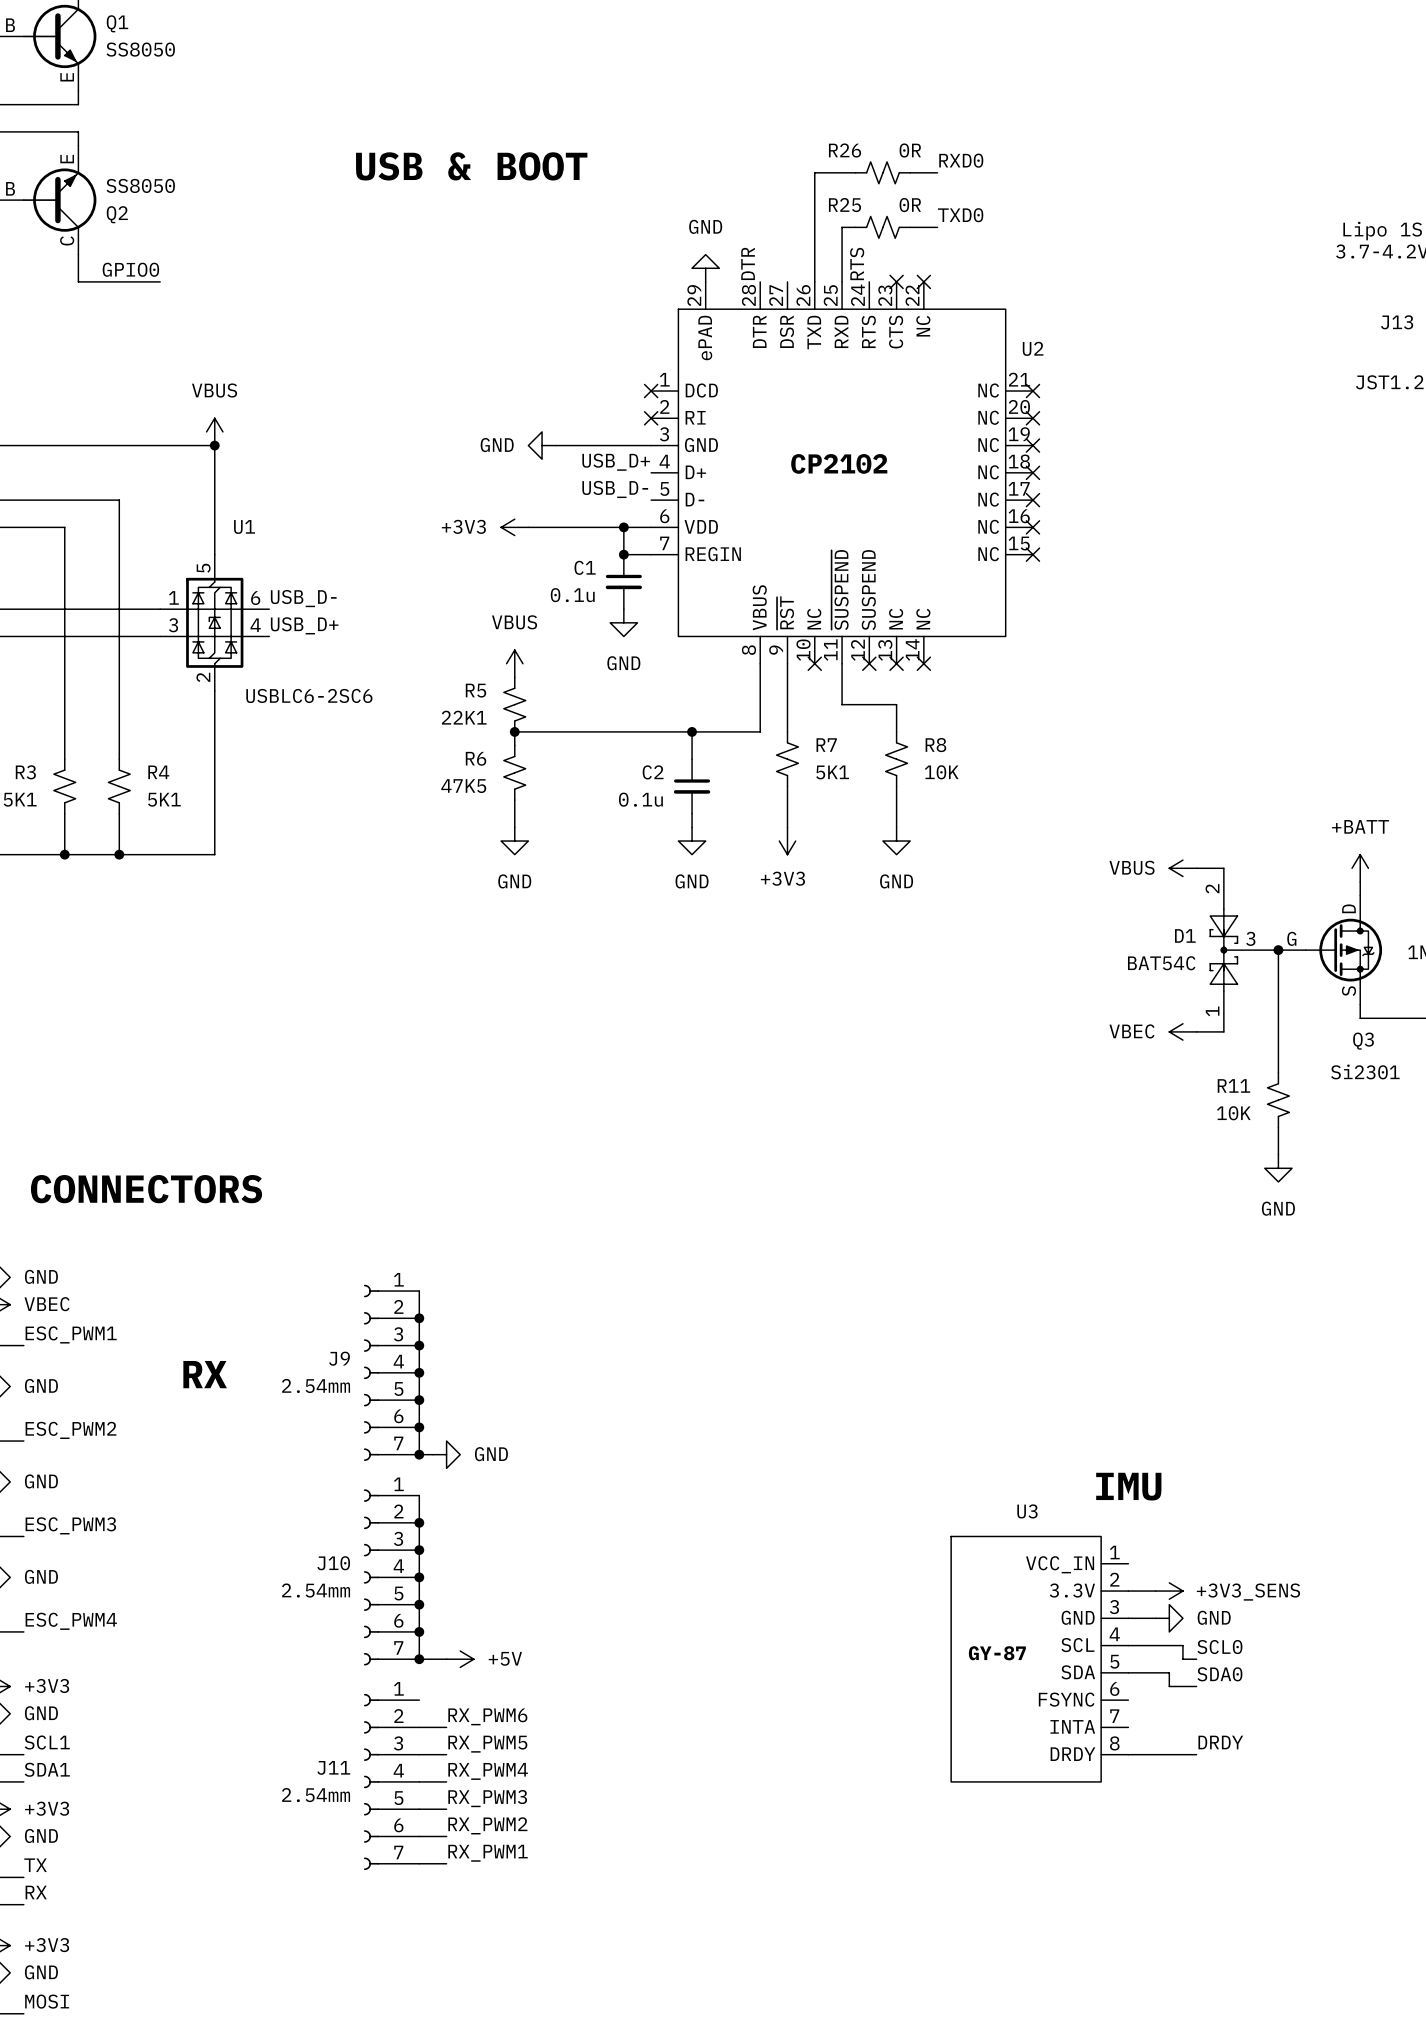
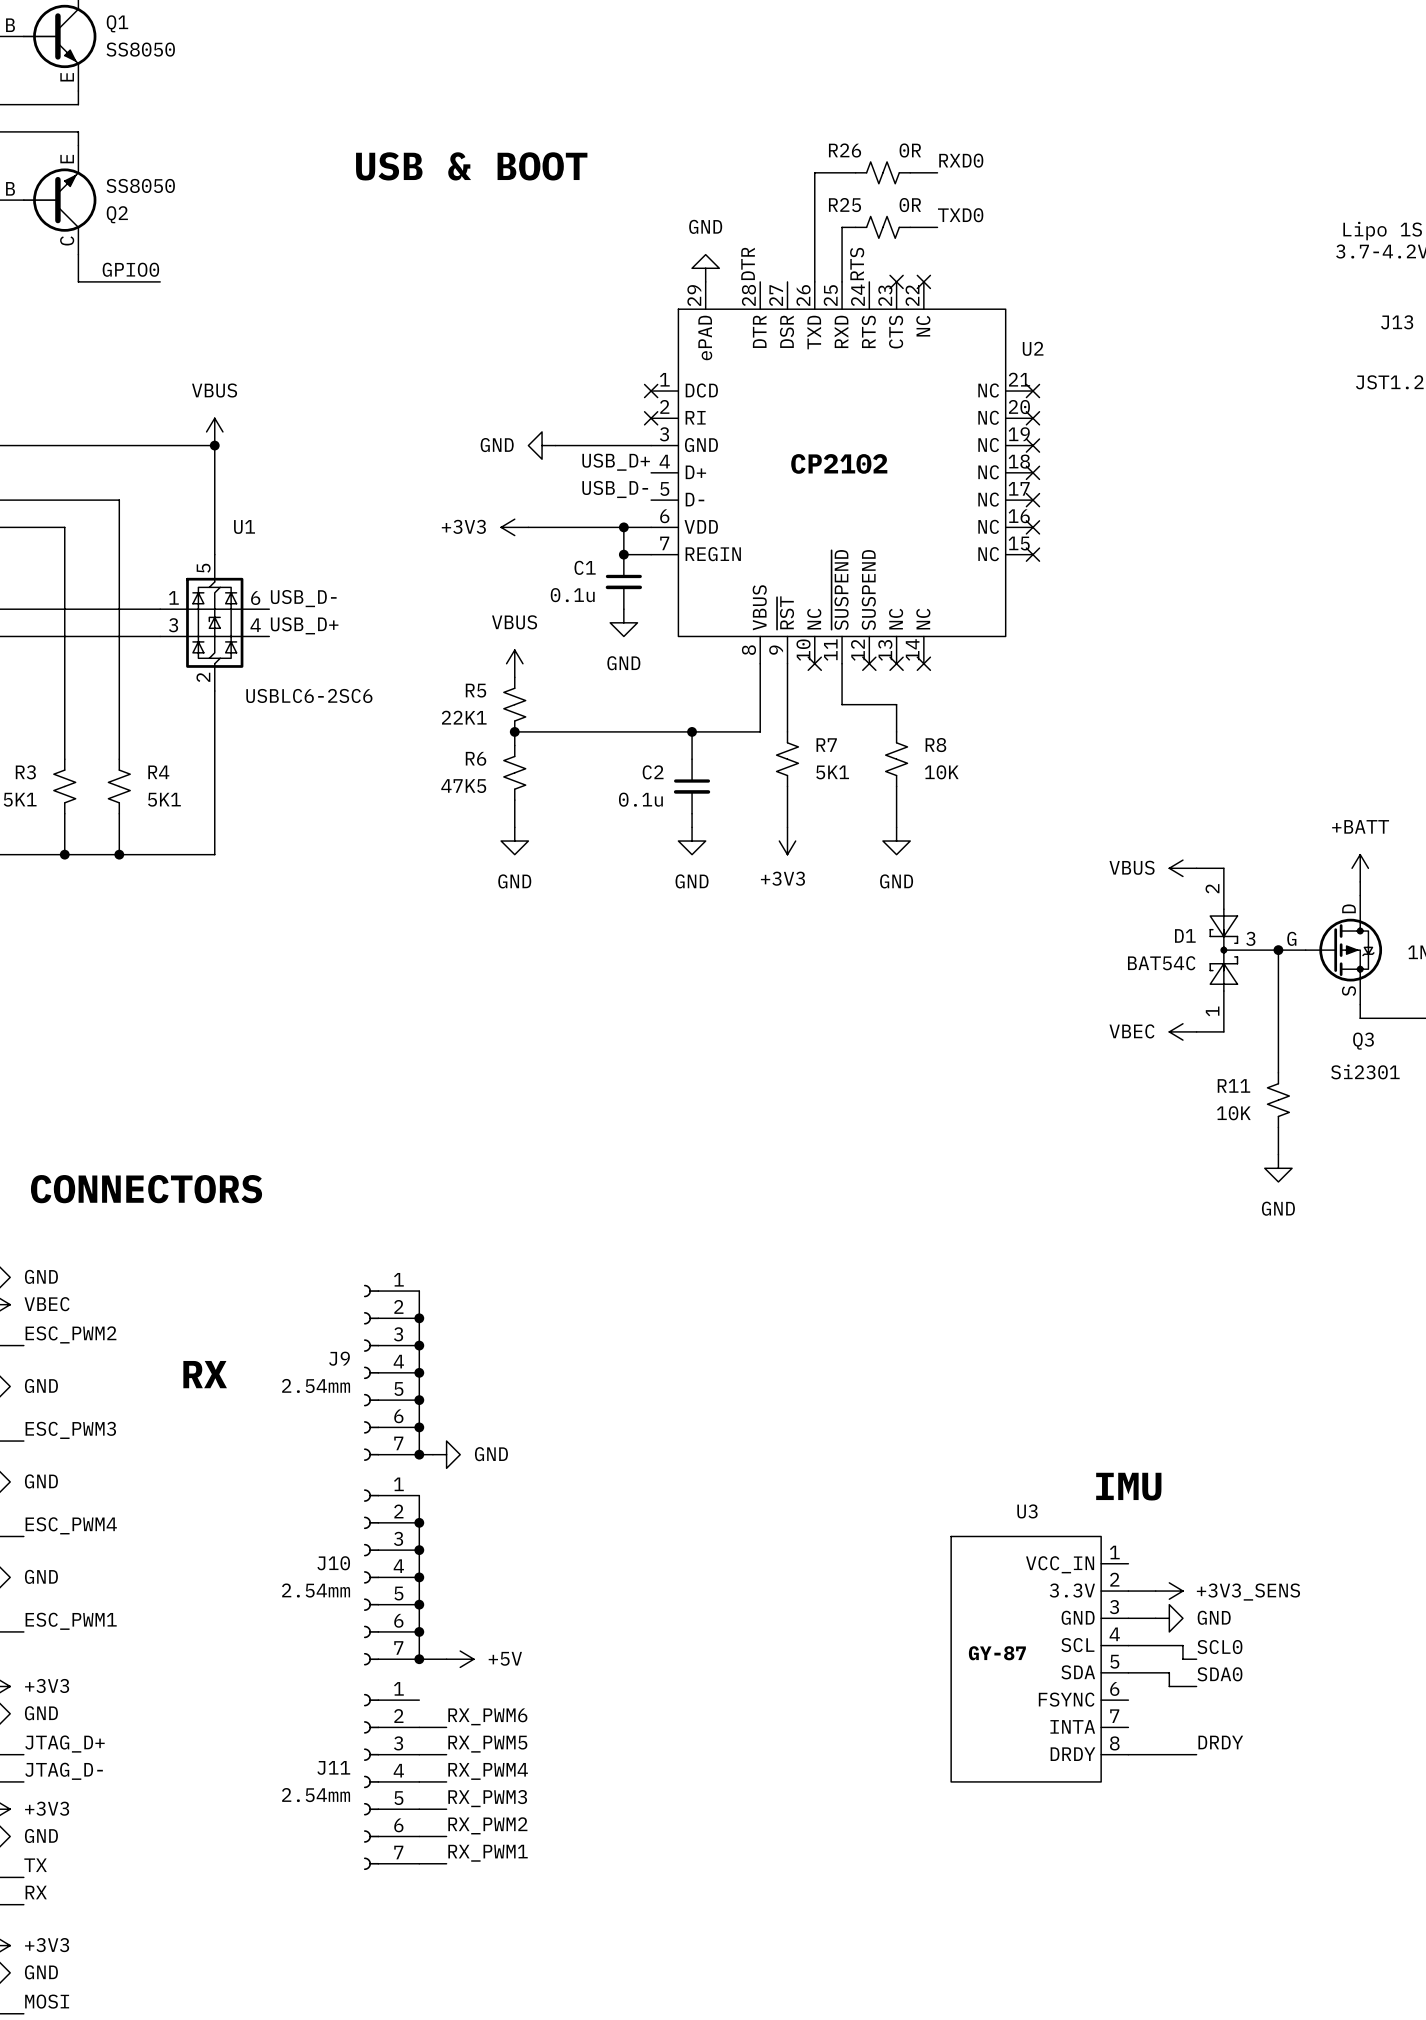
label: ESC_PWM1 (71, 1334) -> ESC_PWM2 (71, 1334)
label: ESC_PWM2 (71, 1430) -> ESC_PWM3 (70, 1430)
label: ESC_PWM3 (70, 1525) -> ESC_PWM4 (71, 1525)
label: ESC_PWM4 (71, 1621) -> ESC_PWM1 (71, 1621)
label: SCL1 (47, 1742) -> JTAG_D+ (64, 1744)
label: SDA1 (47, 1769) -> JTAG_D- (64, 1771)

